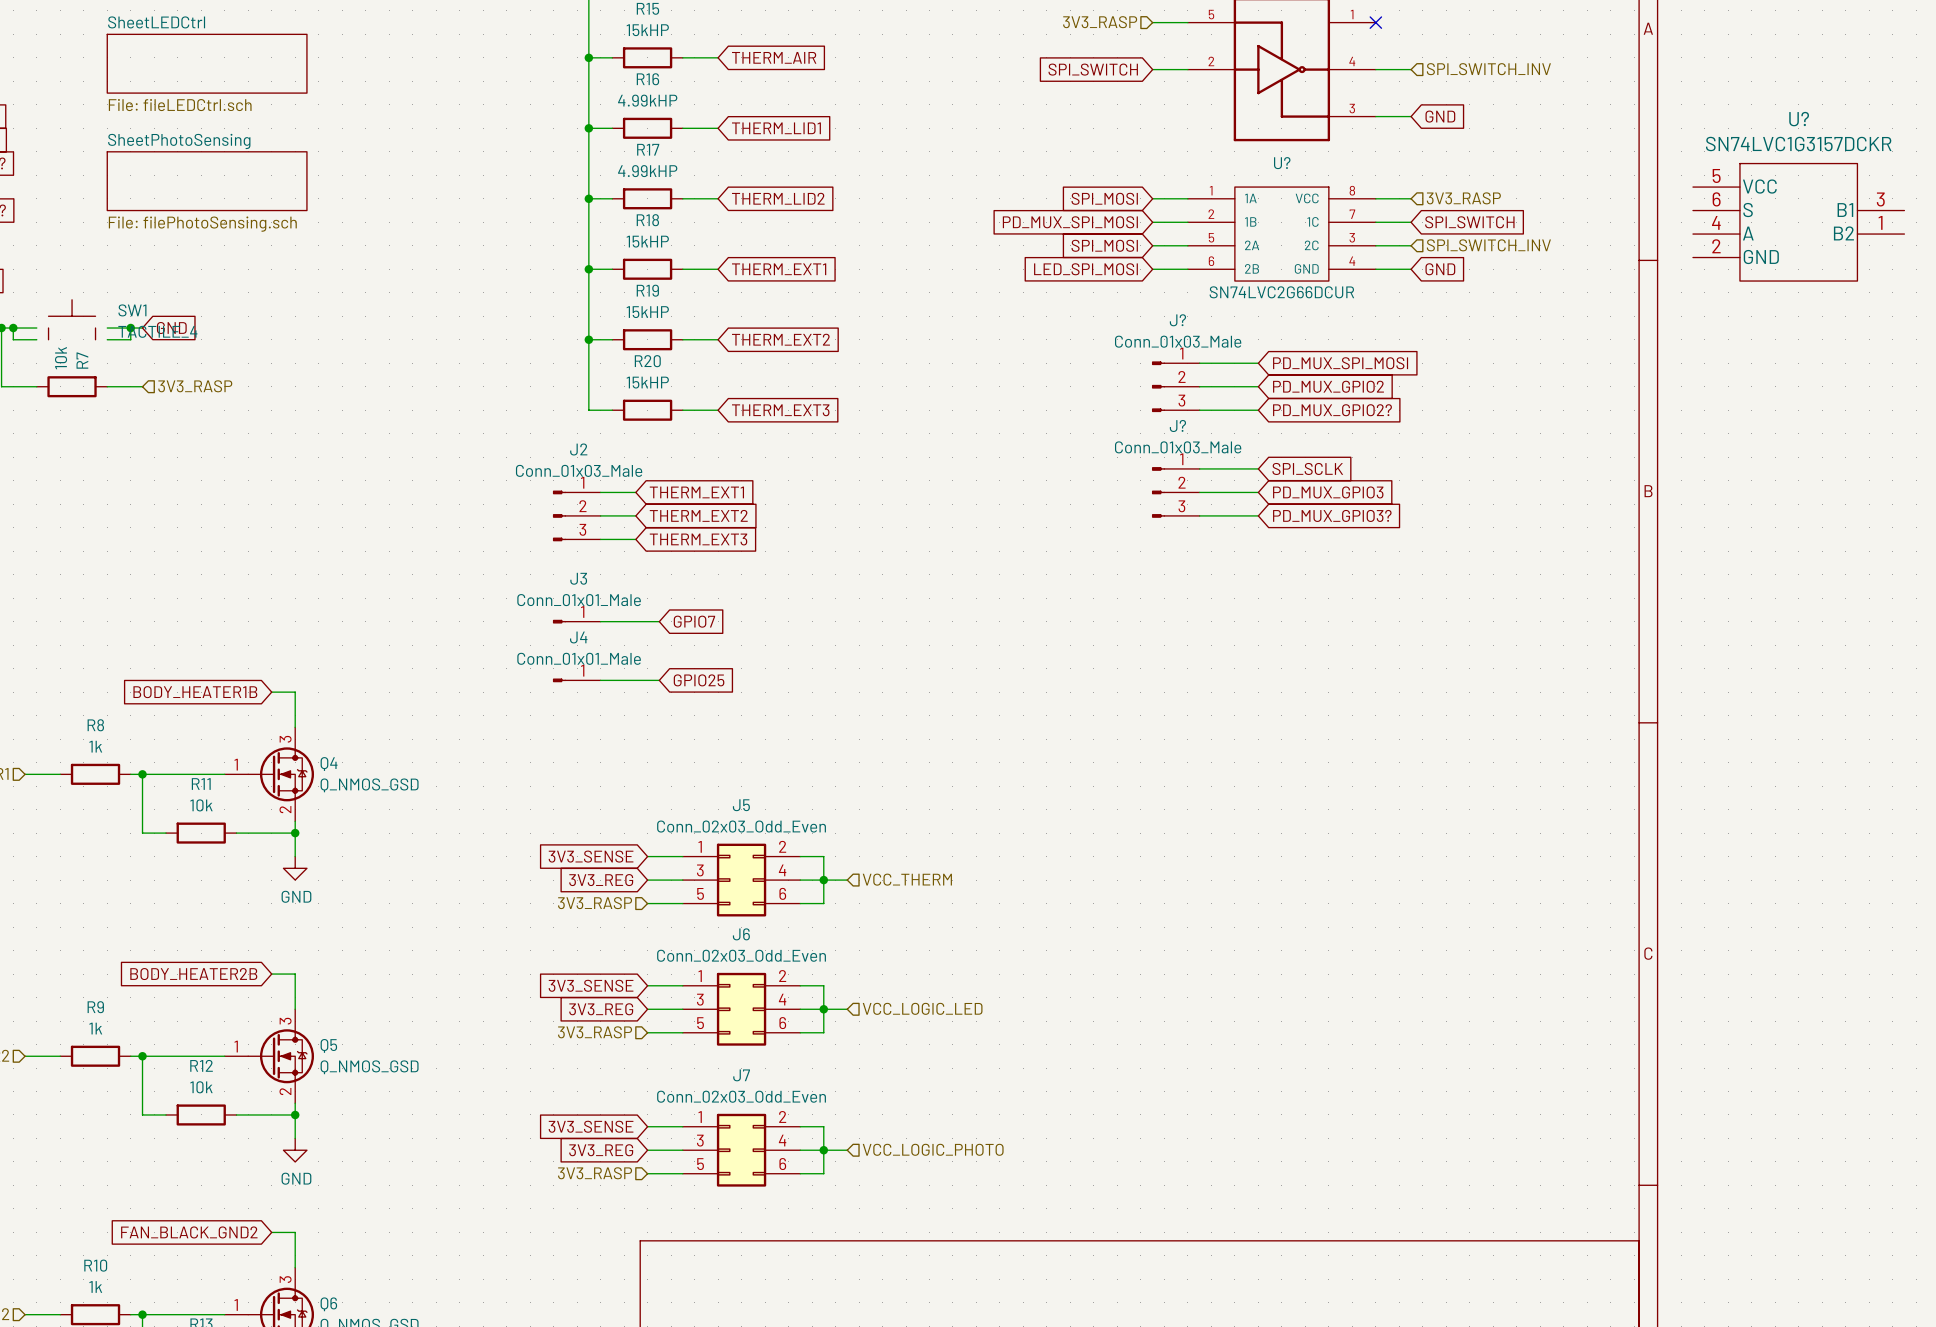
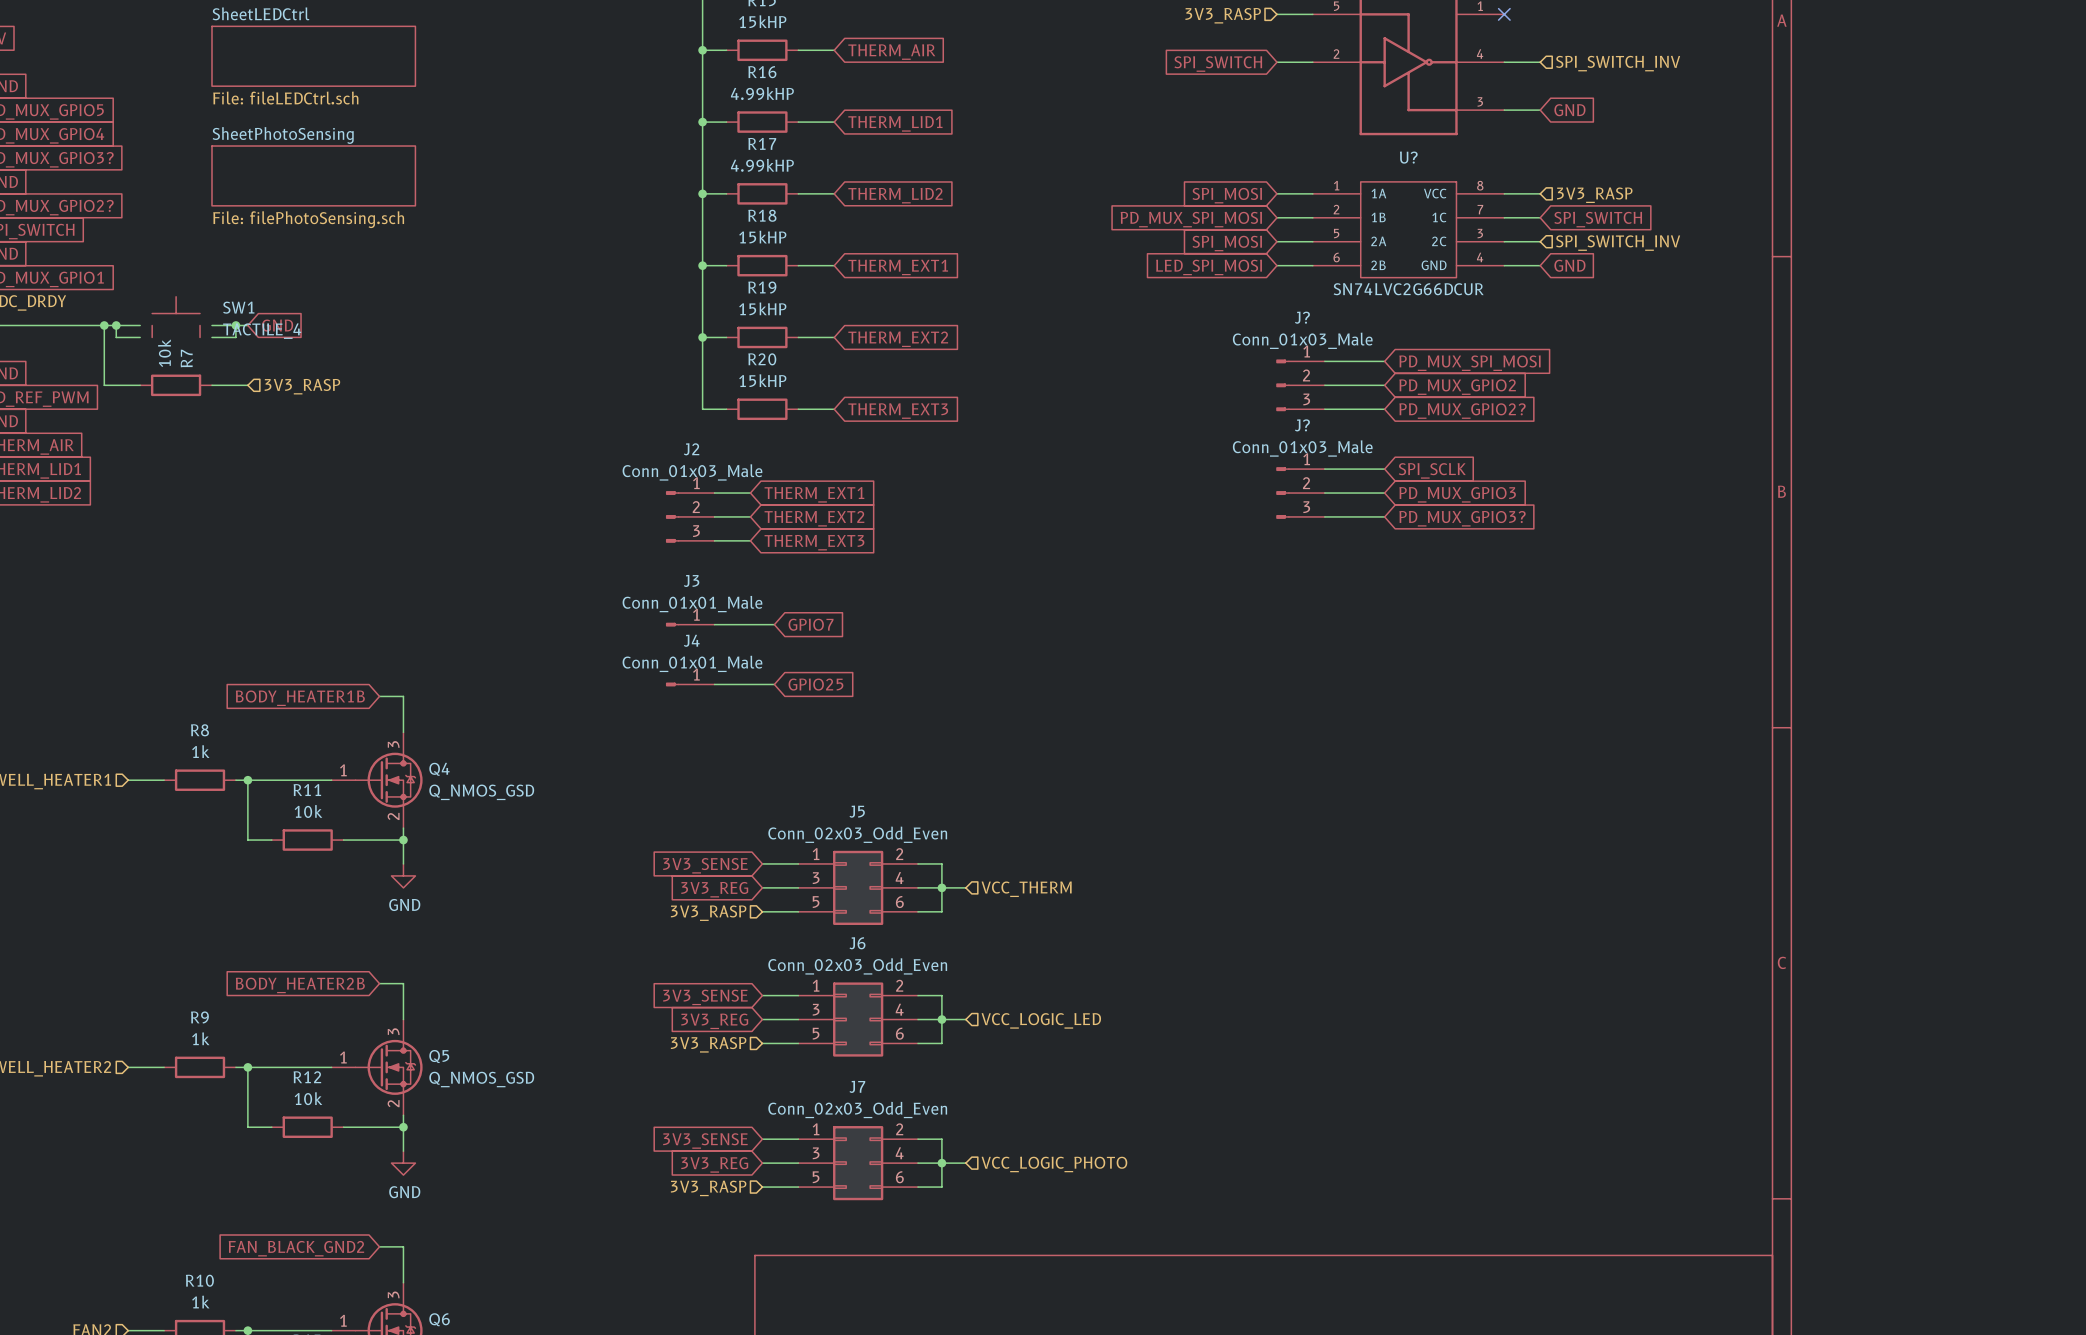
U?: SN74LVC1G3157DCKR (1798, 222) -> none

